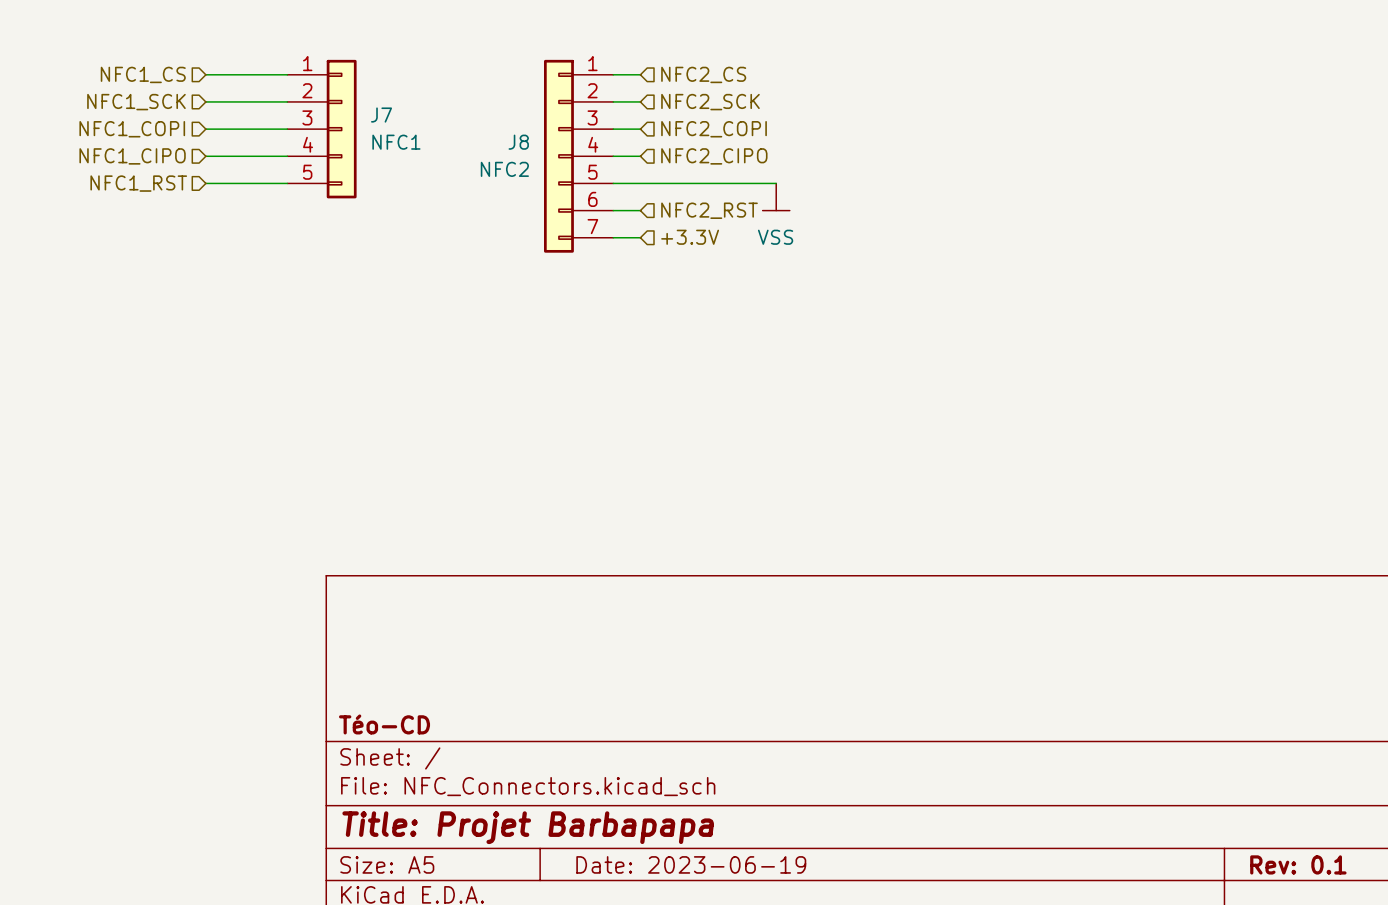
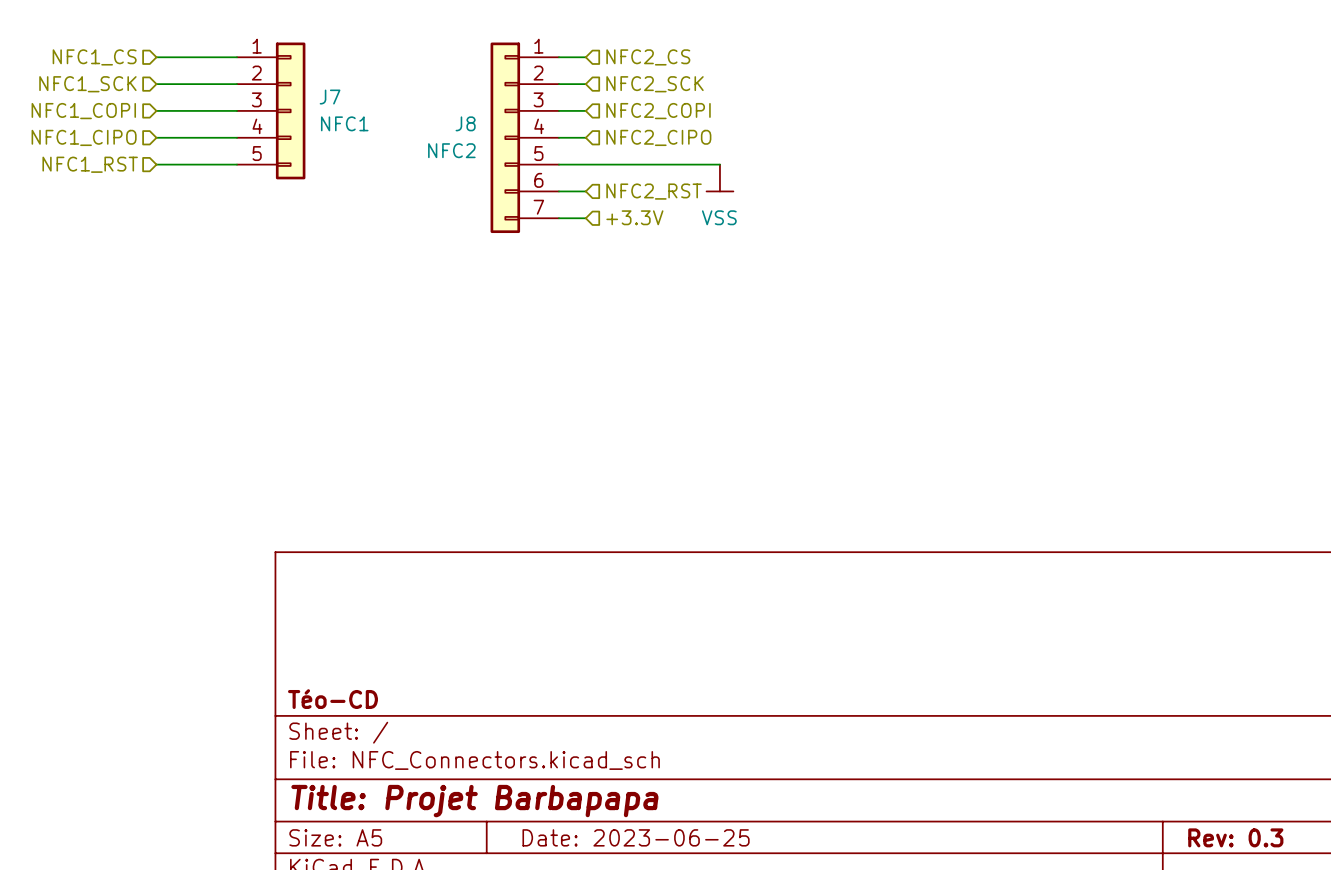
title block: Date: 2023-06-19 (691, 864) -> Date: 2023-06-25 (636, 837)
title block: Rev: 0.1 (1298, 864) -> Rev: 0.3 (1235, 837)

